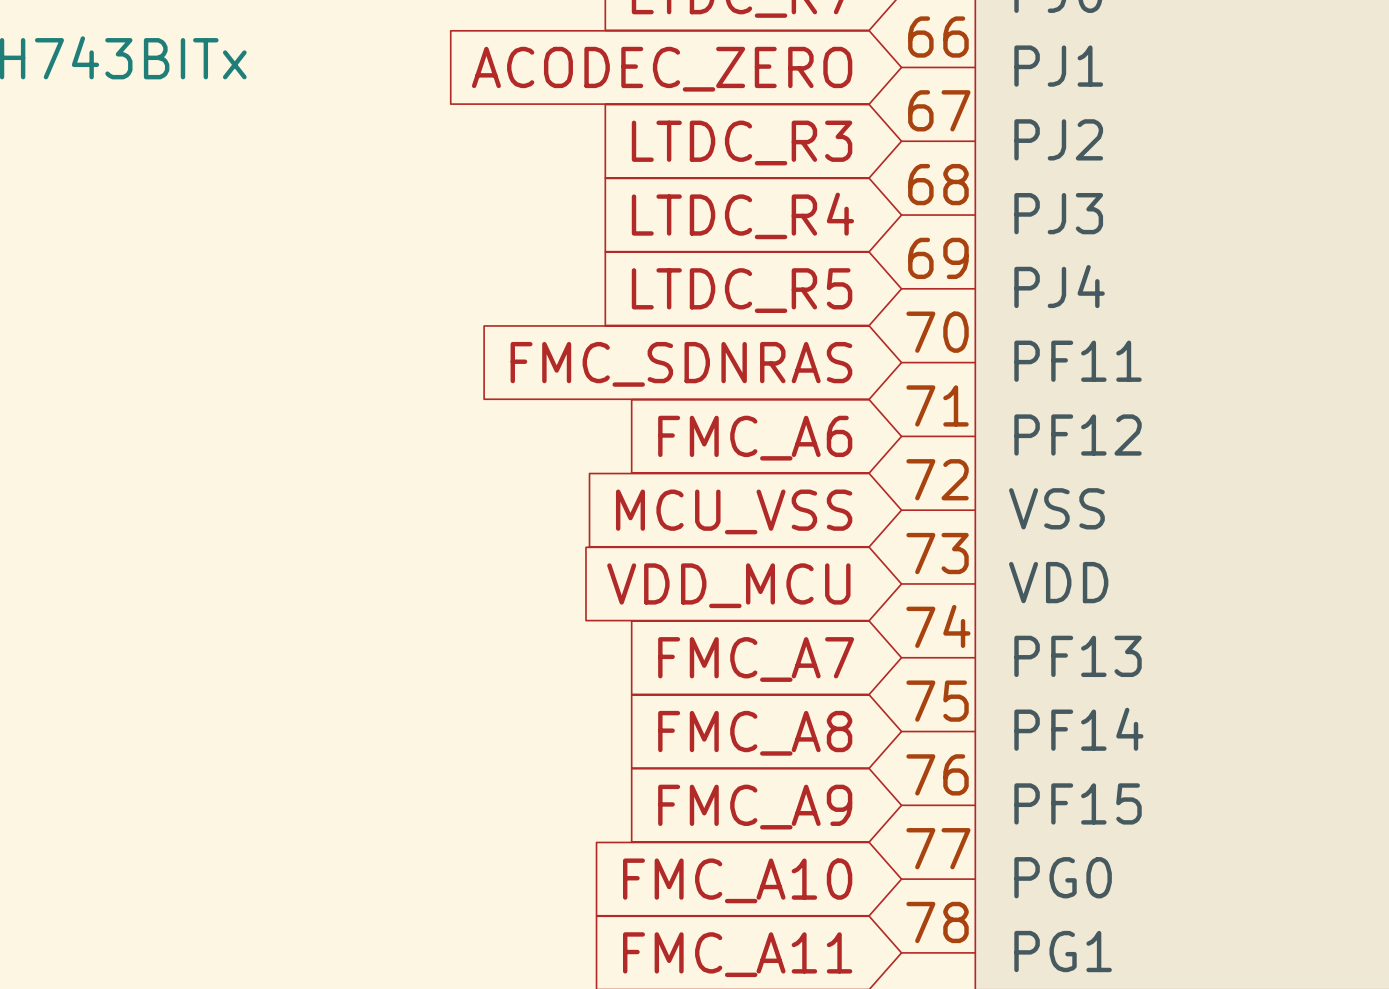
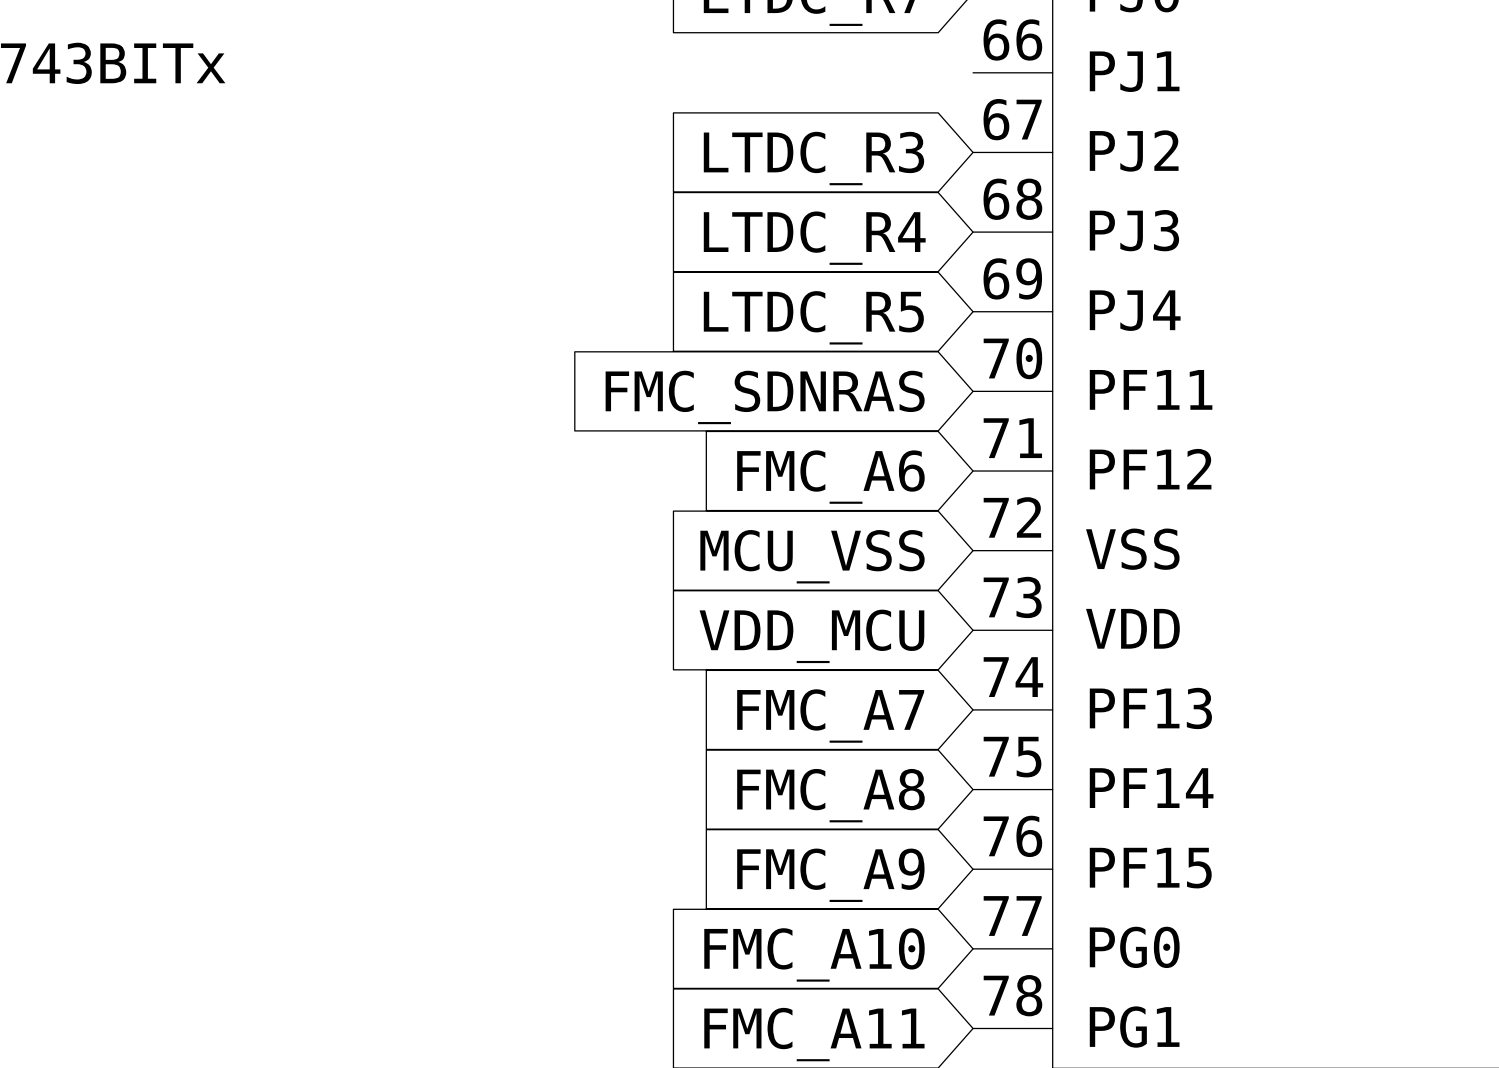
global label: ACODEC_ZERO (662, 69) -> none

